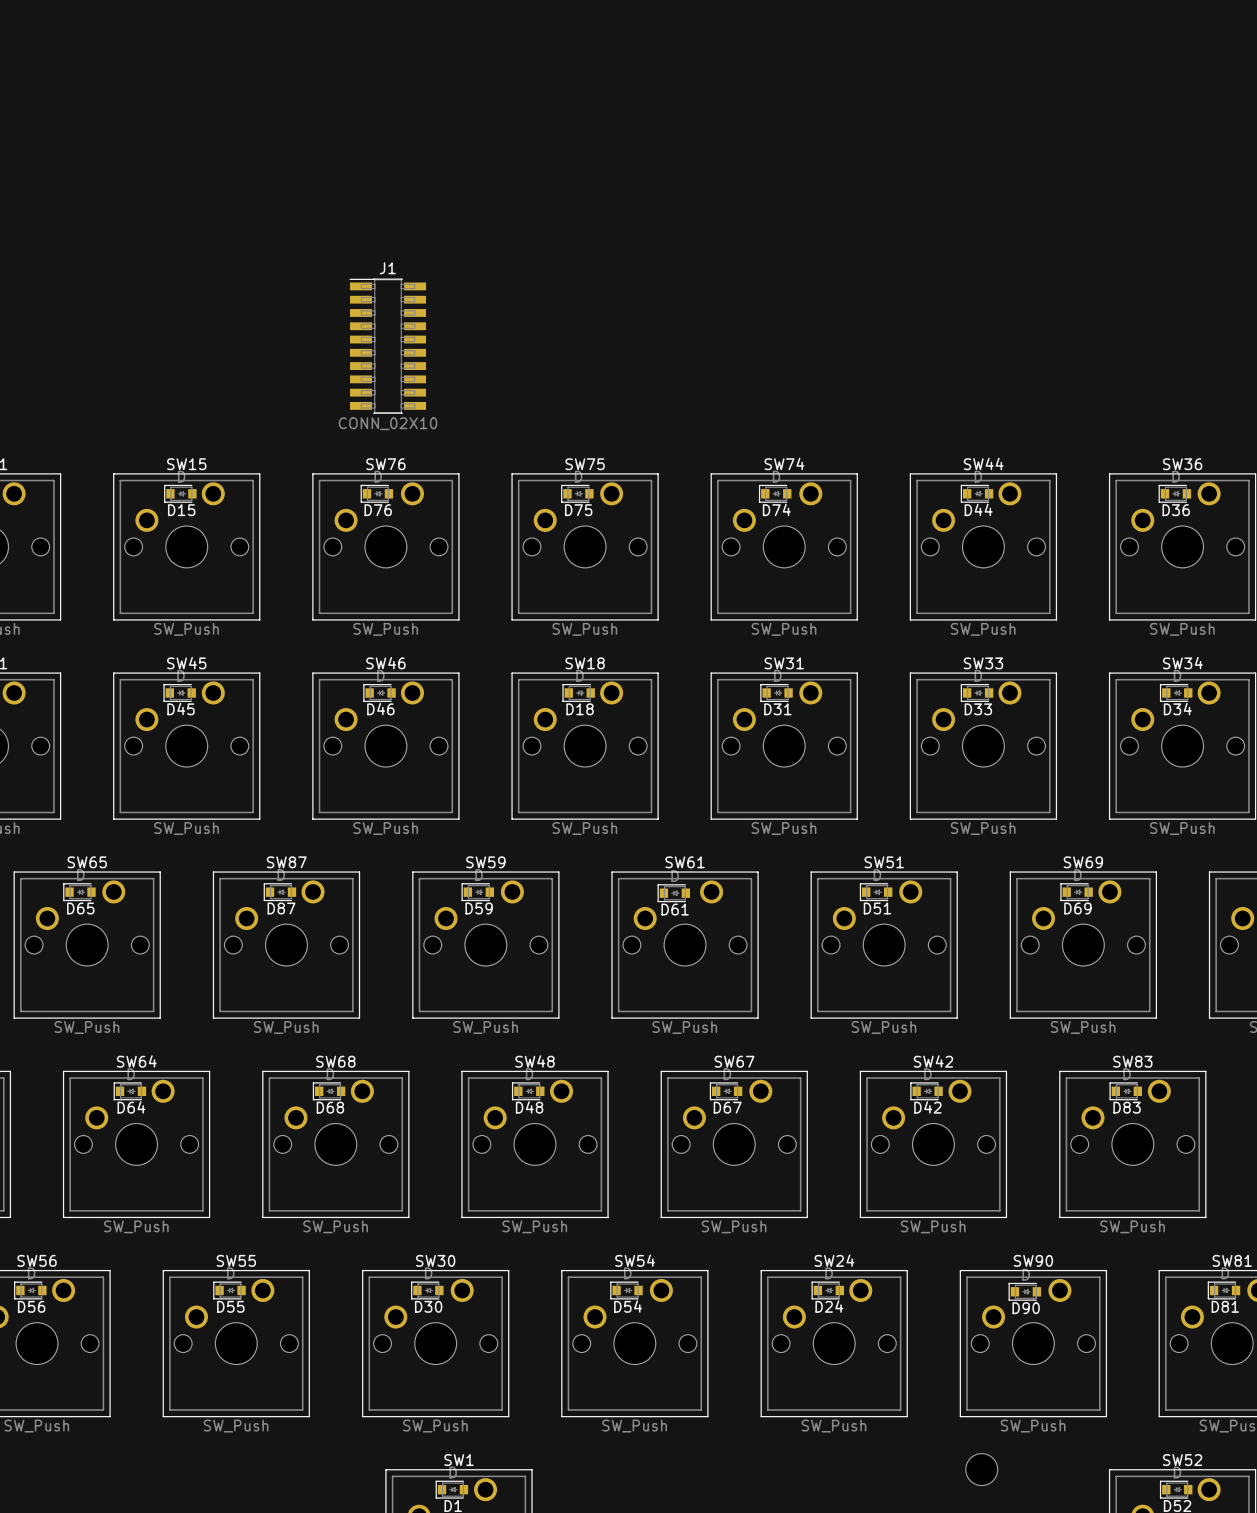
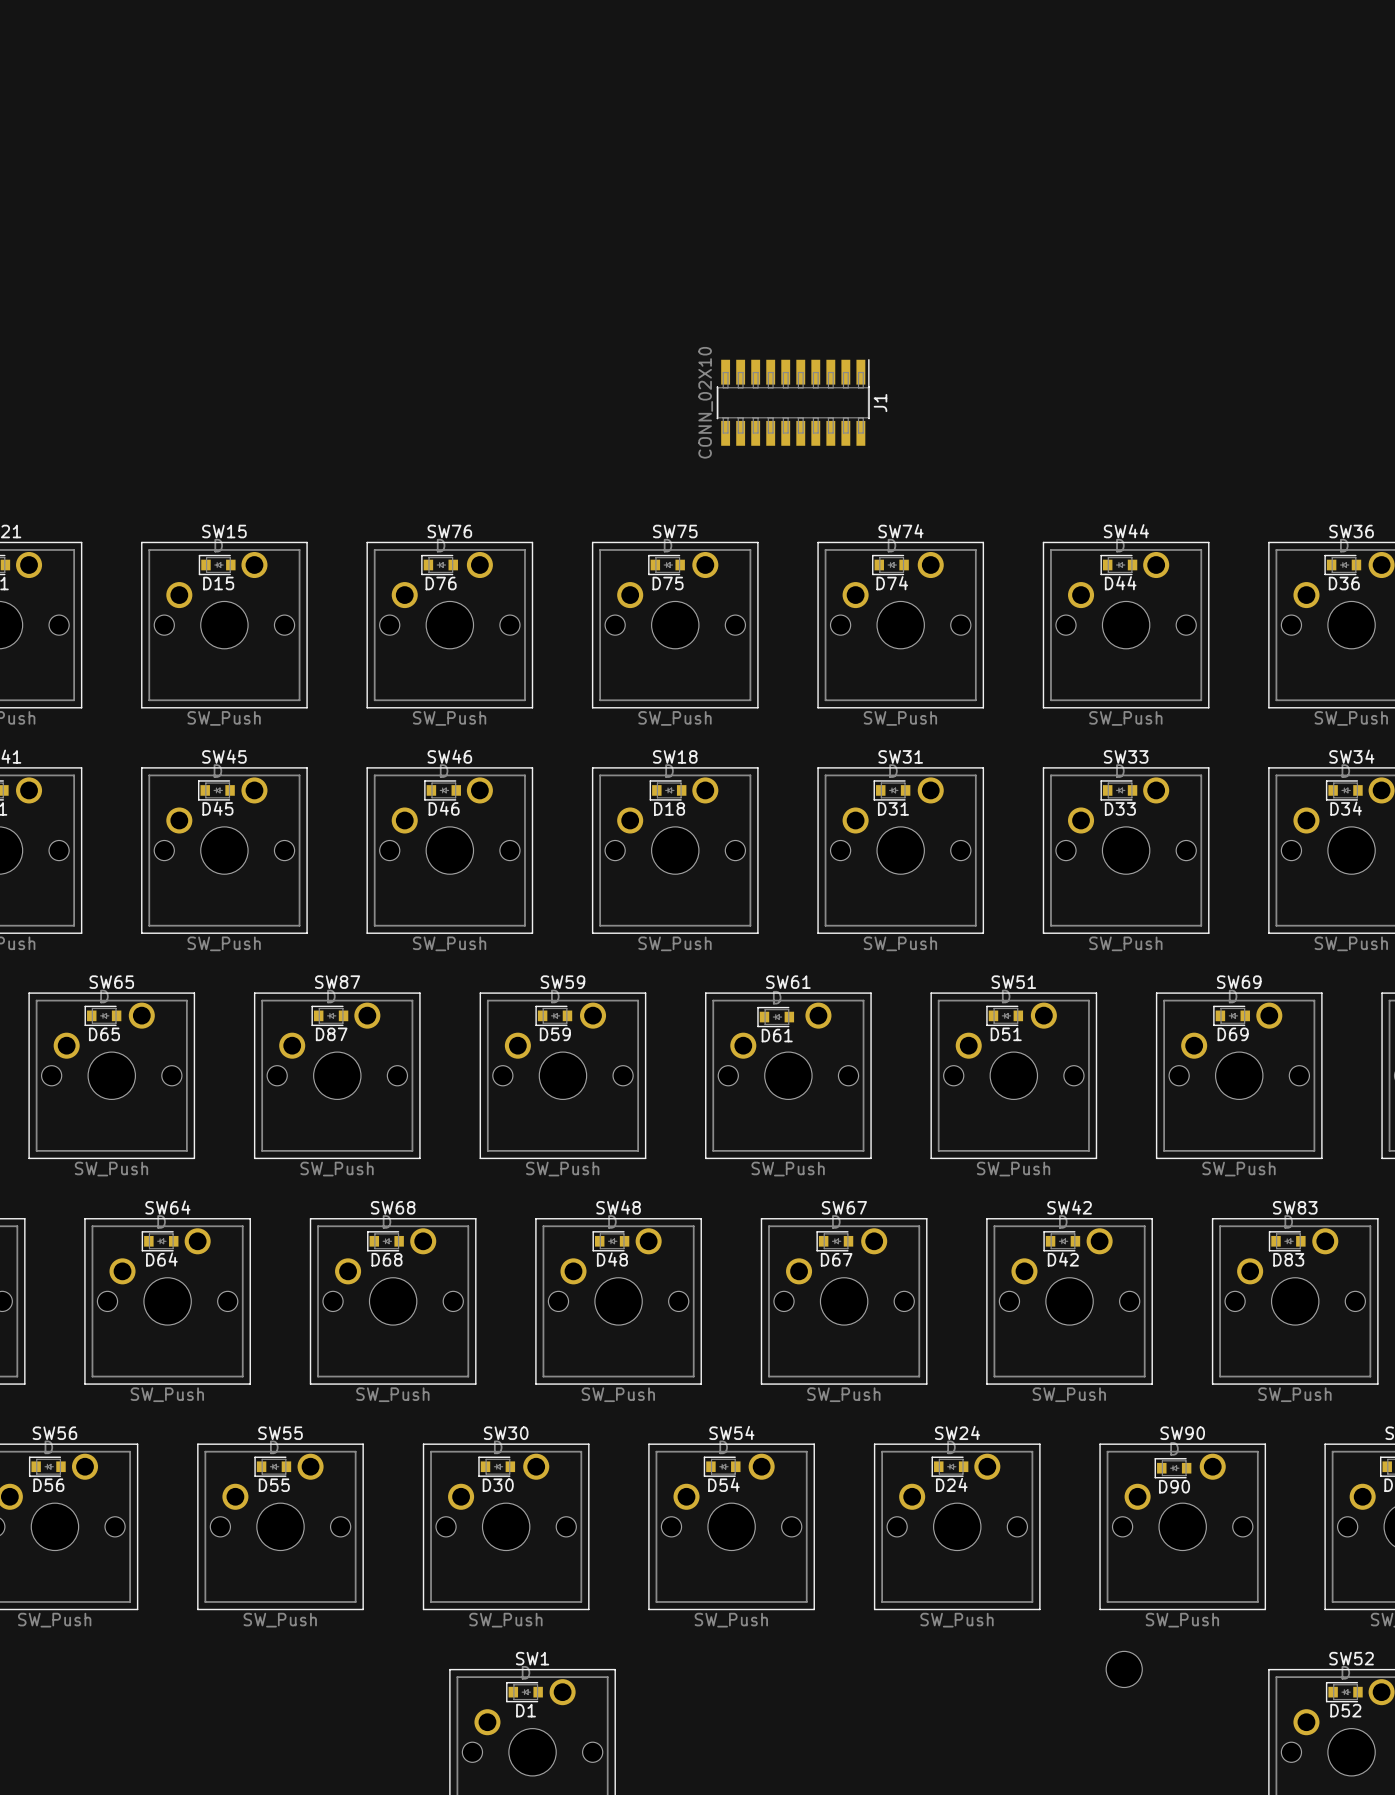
J1 rotation: 0° (387, 346) -> 90° clockwise (793, 402)
J1 position: (387, 346) -> (793, 402)

